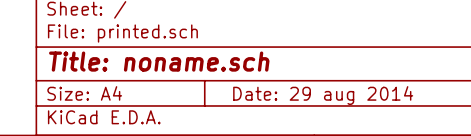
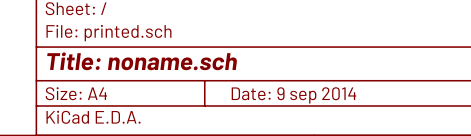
title block: Date: 29 aug 2014 (323, 95) -> Date: 9 sep 2014 (293, 95)

